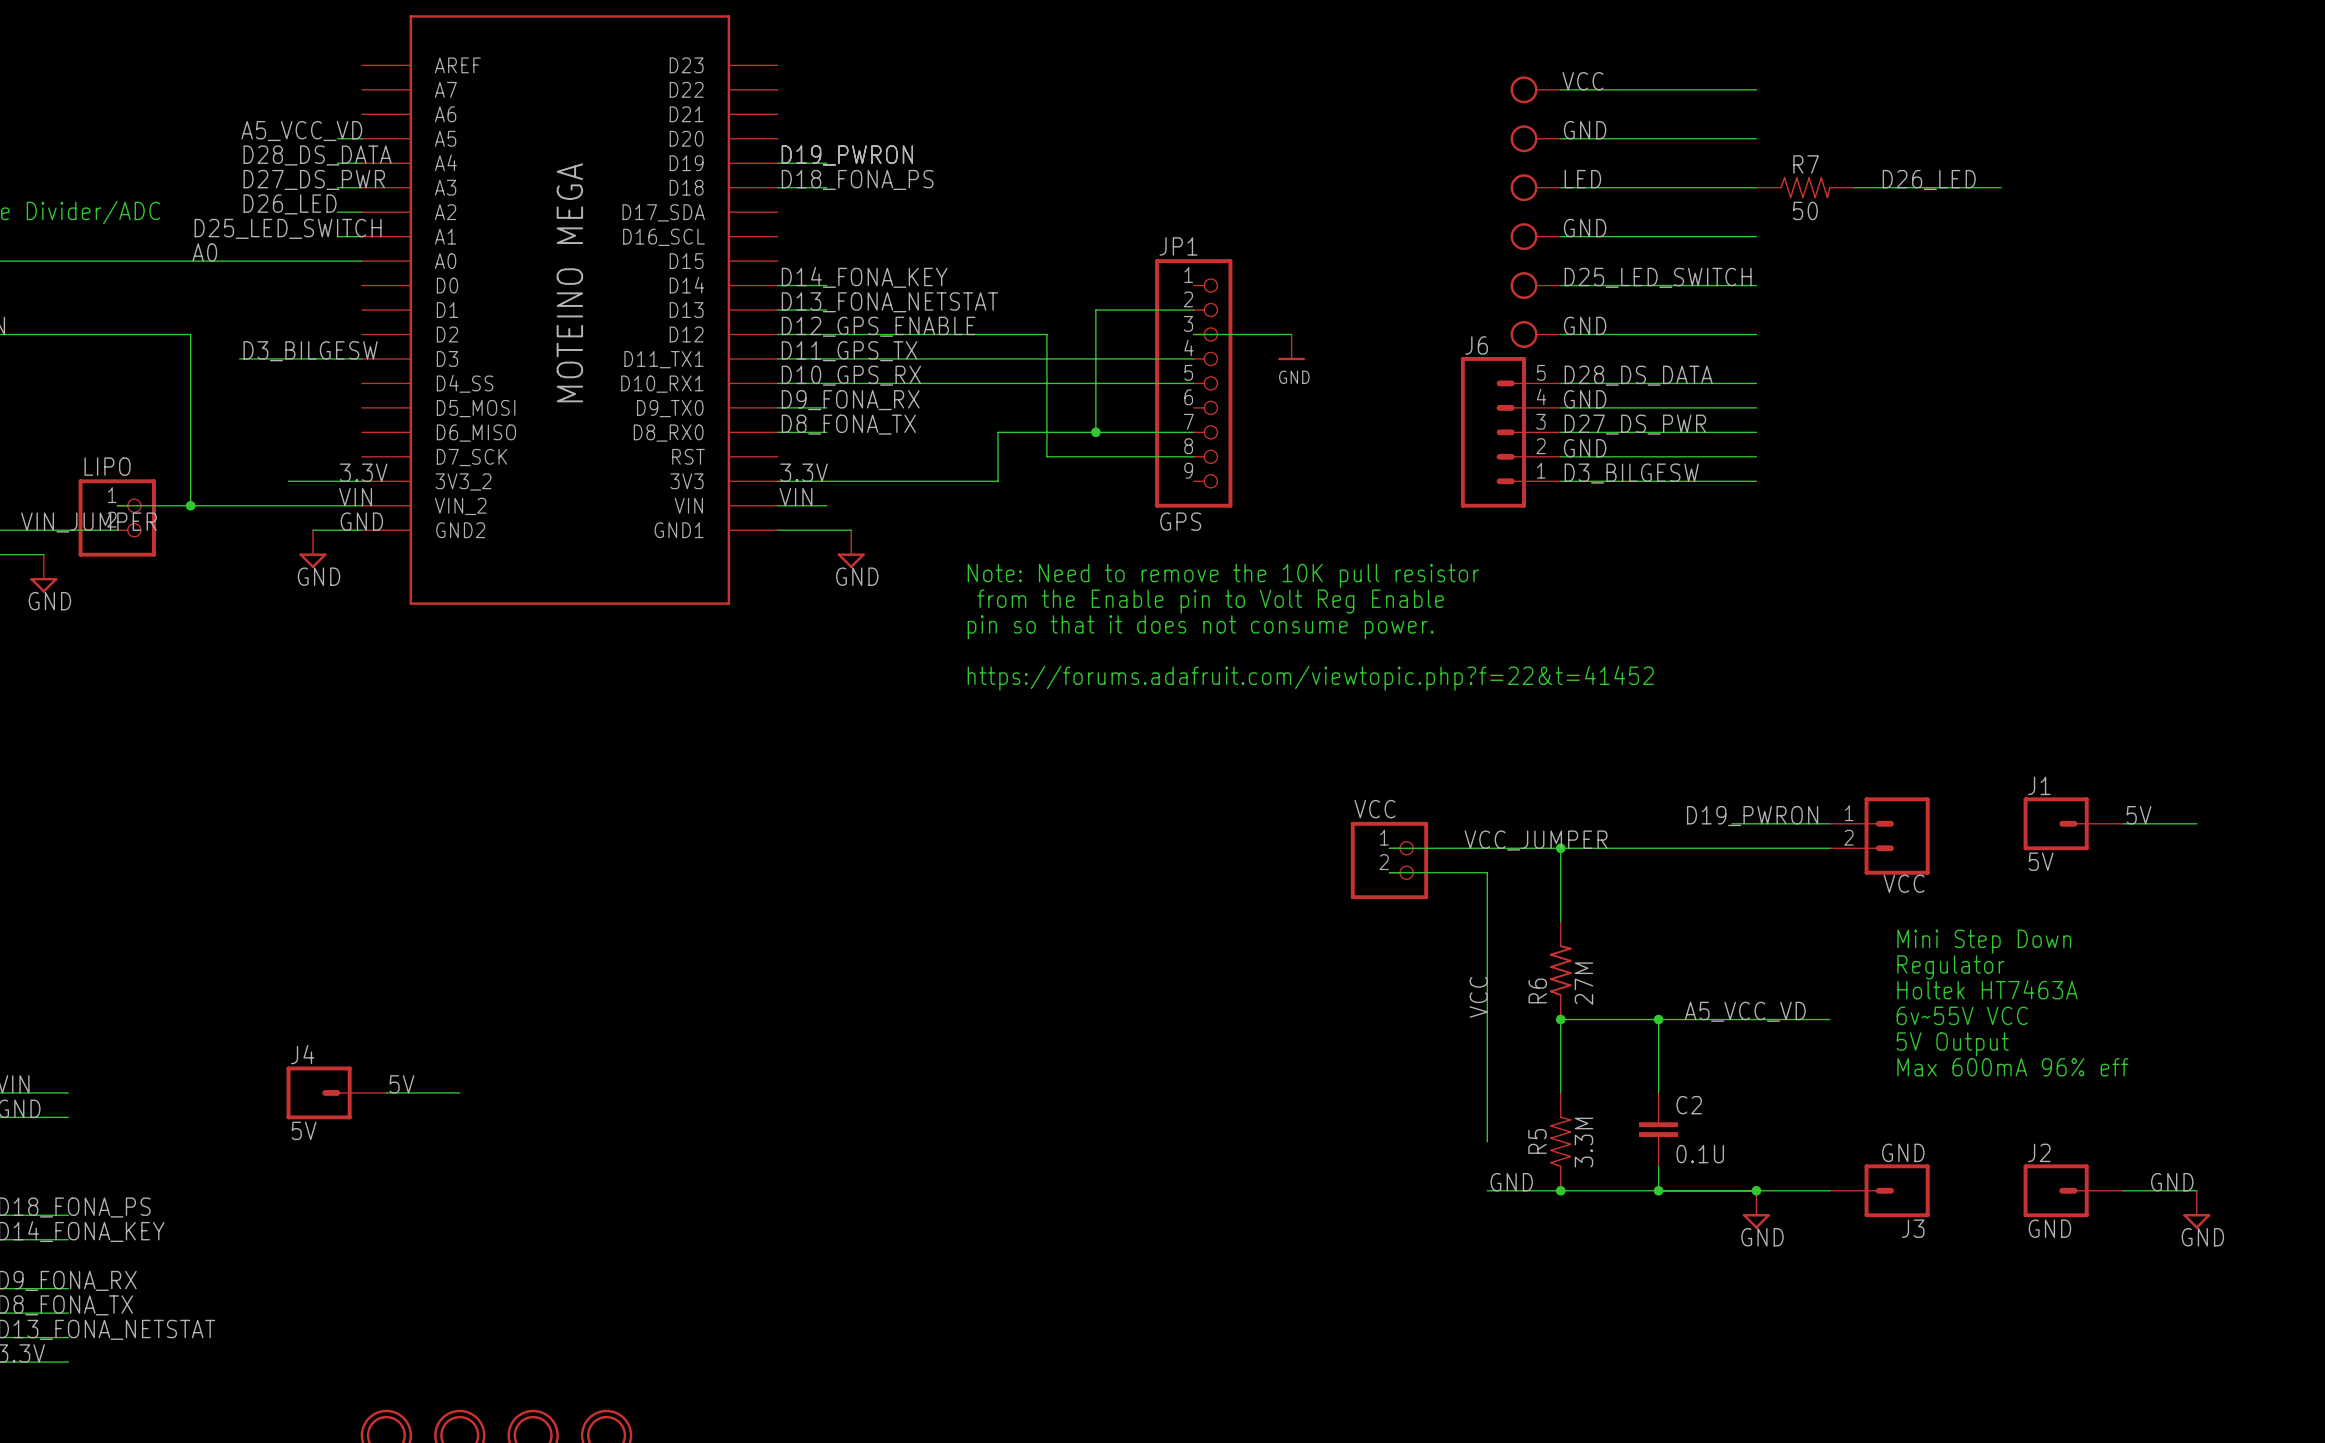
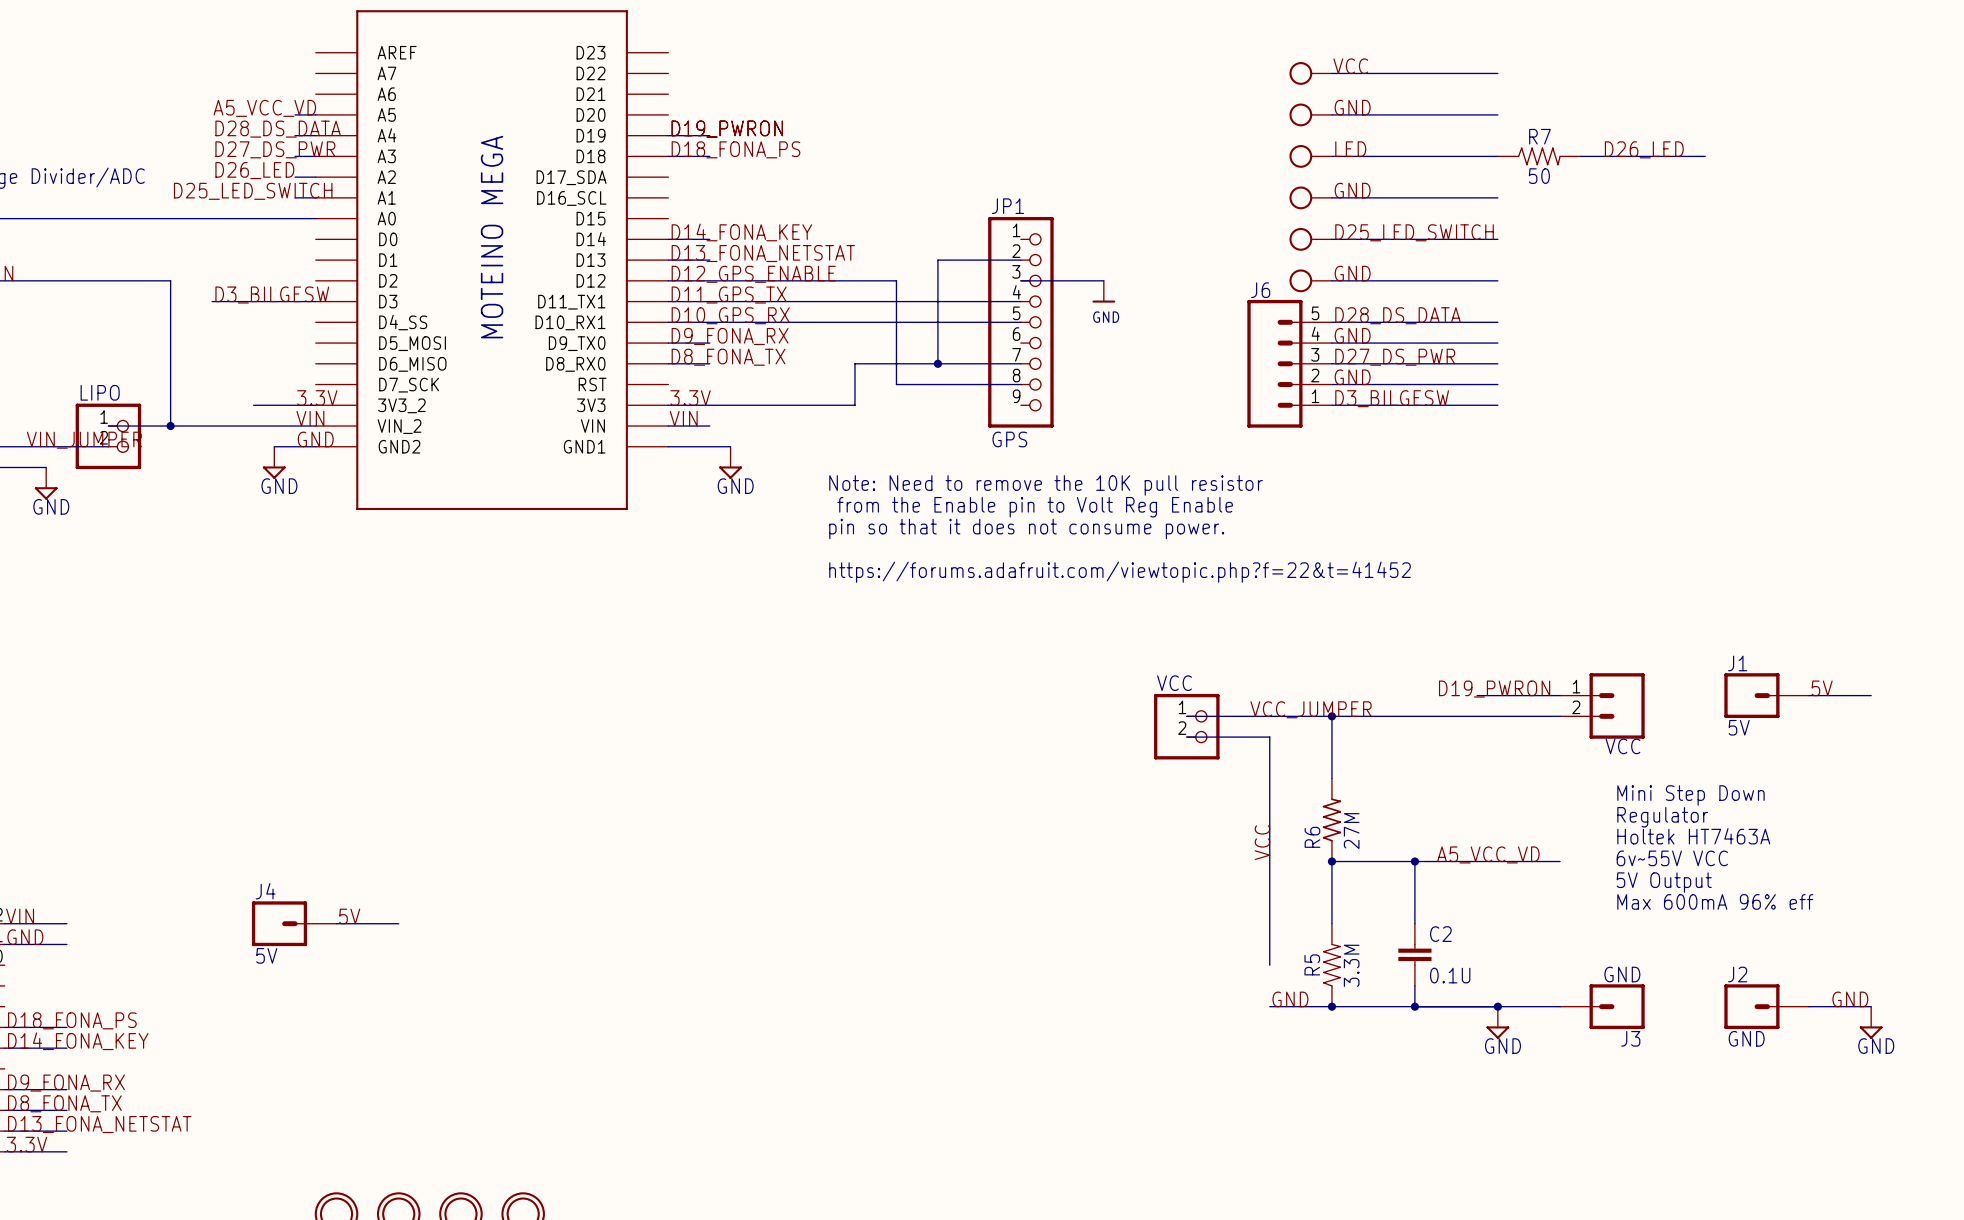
label: A0 (204, 252) -> none

